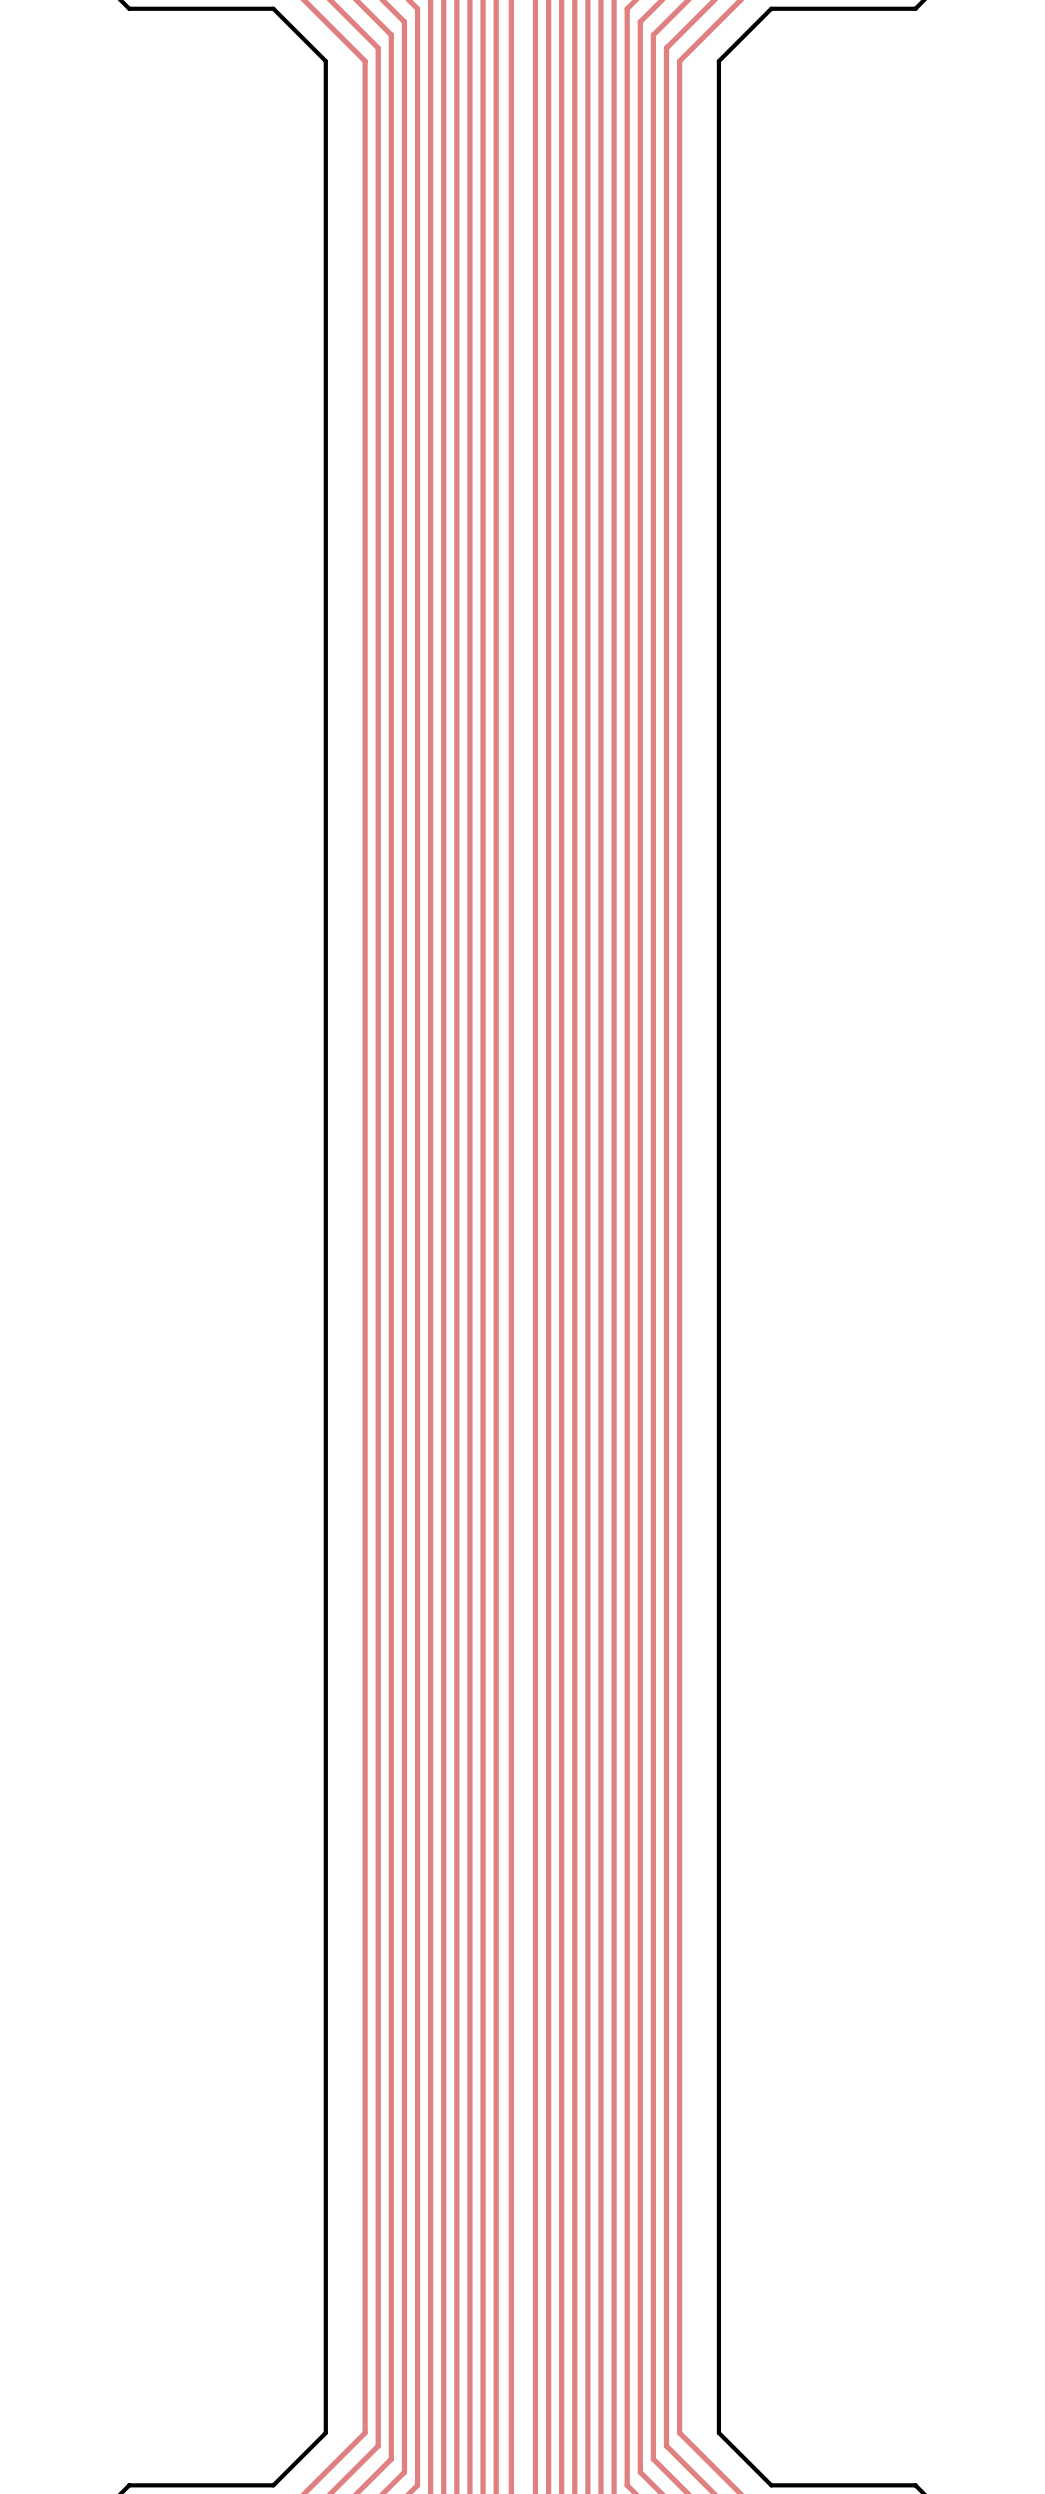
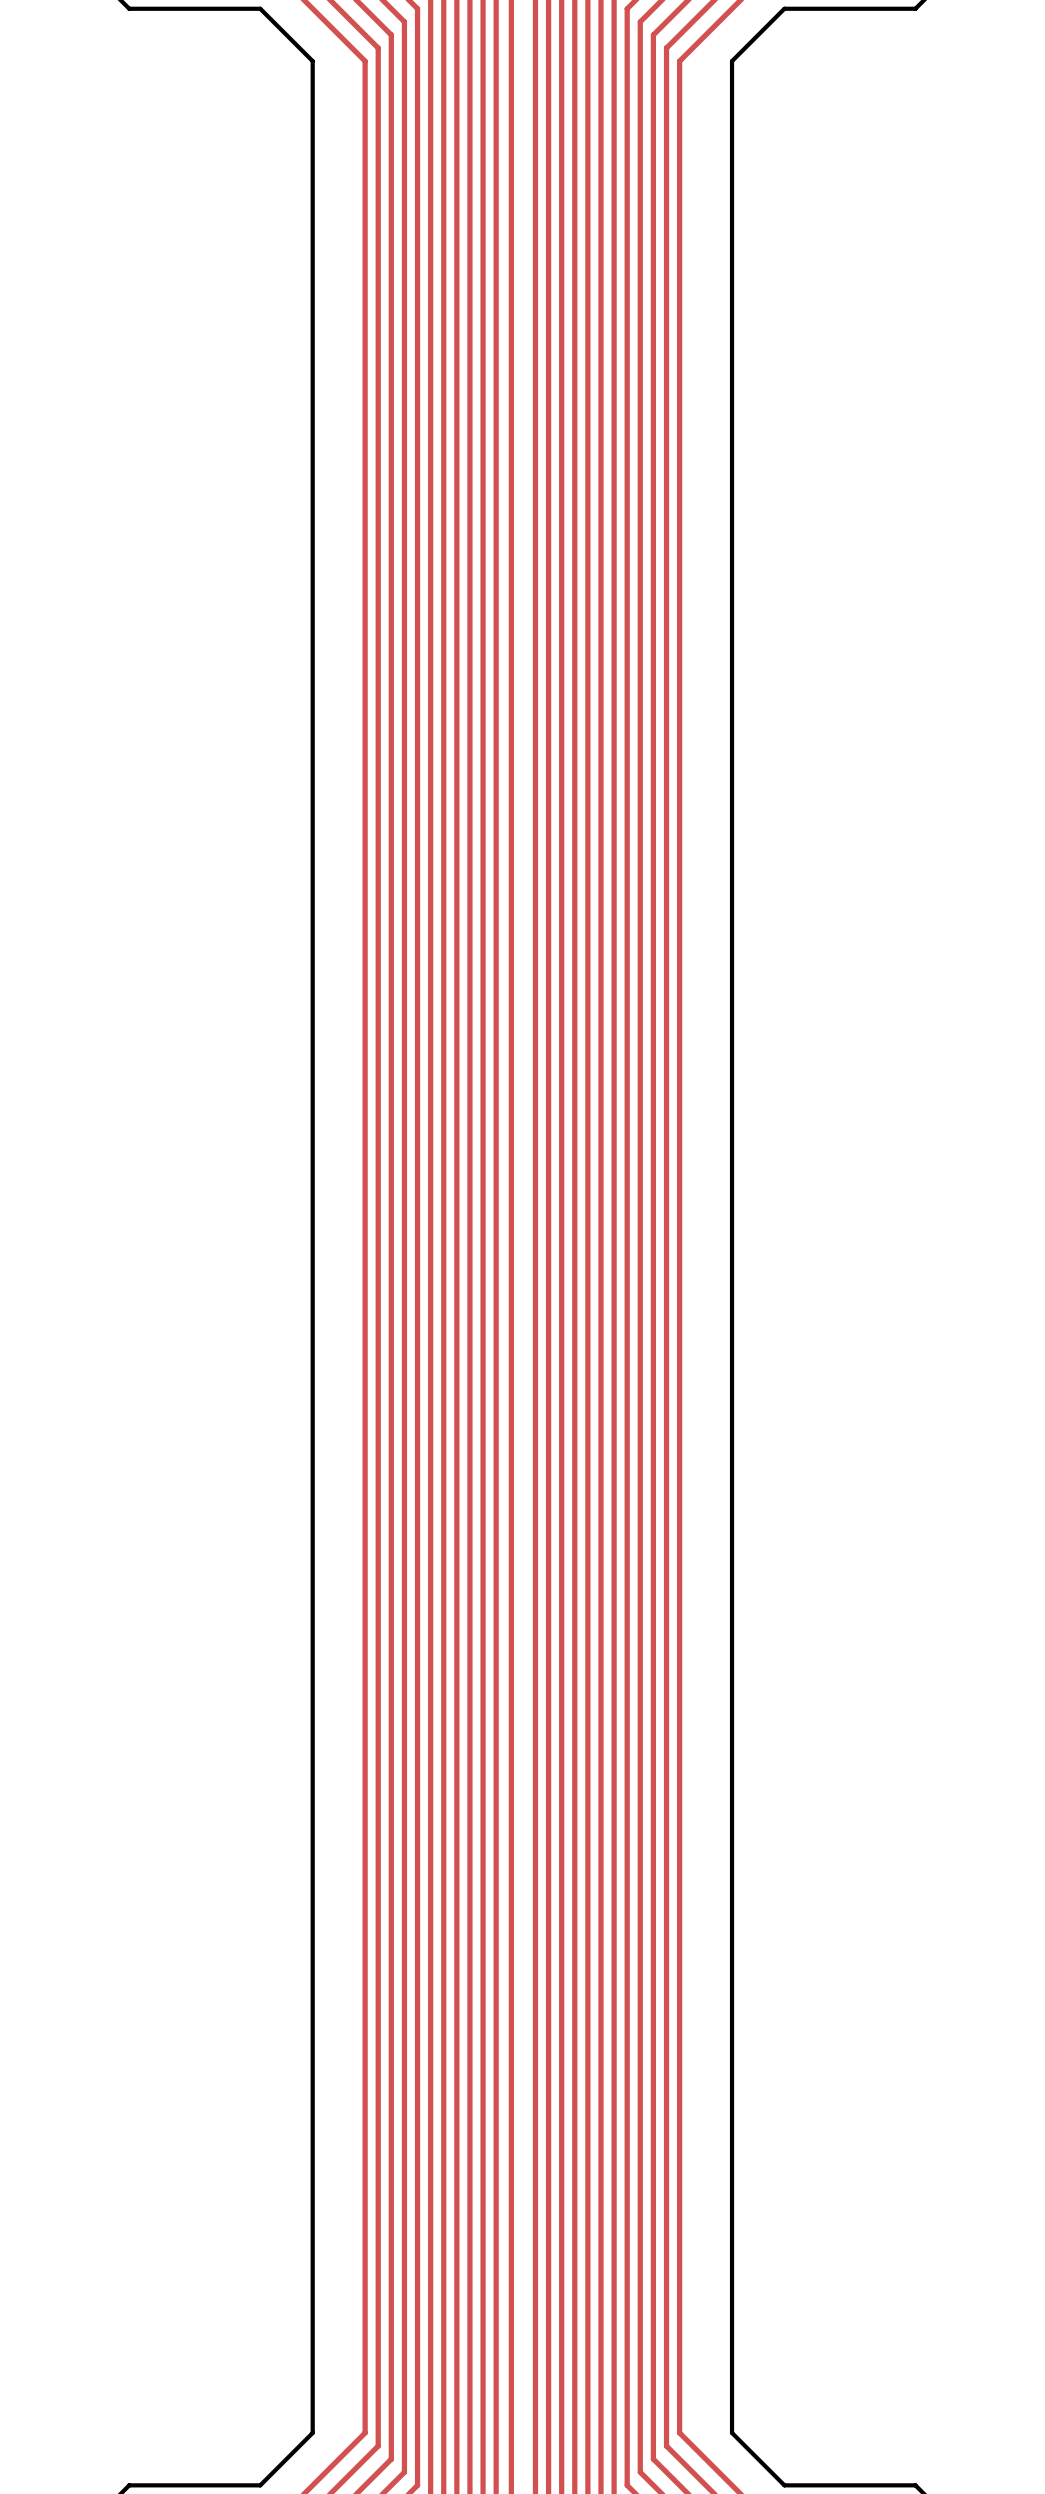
board edge: (260, 8) (273, 8) (325, 61) (325, 2432) (273, 2485) (260, 2485) -> (260, 8) (312, 61) (312, 2432) (260, 2485)
board edge: (784, 8) (771, 8) (718, 61) (718, 2432) (771, 2485) (784, 2485) -> (784, 8) (732, 61) (732, 2432) (784, 2485)

